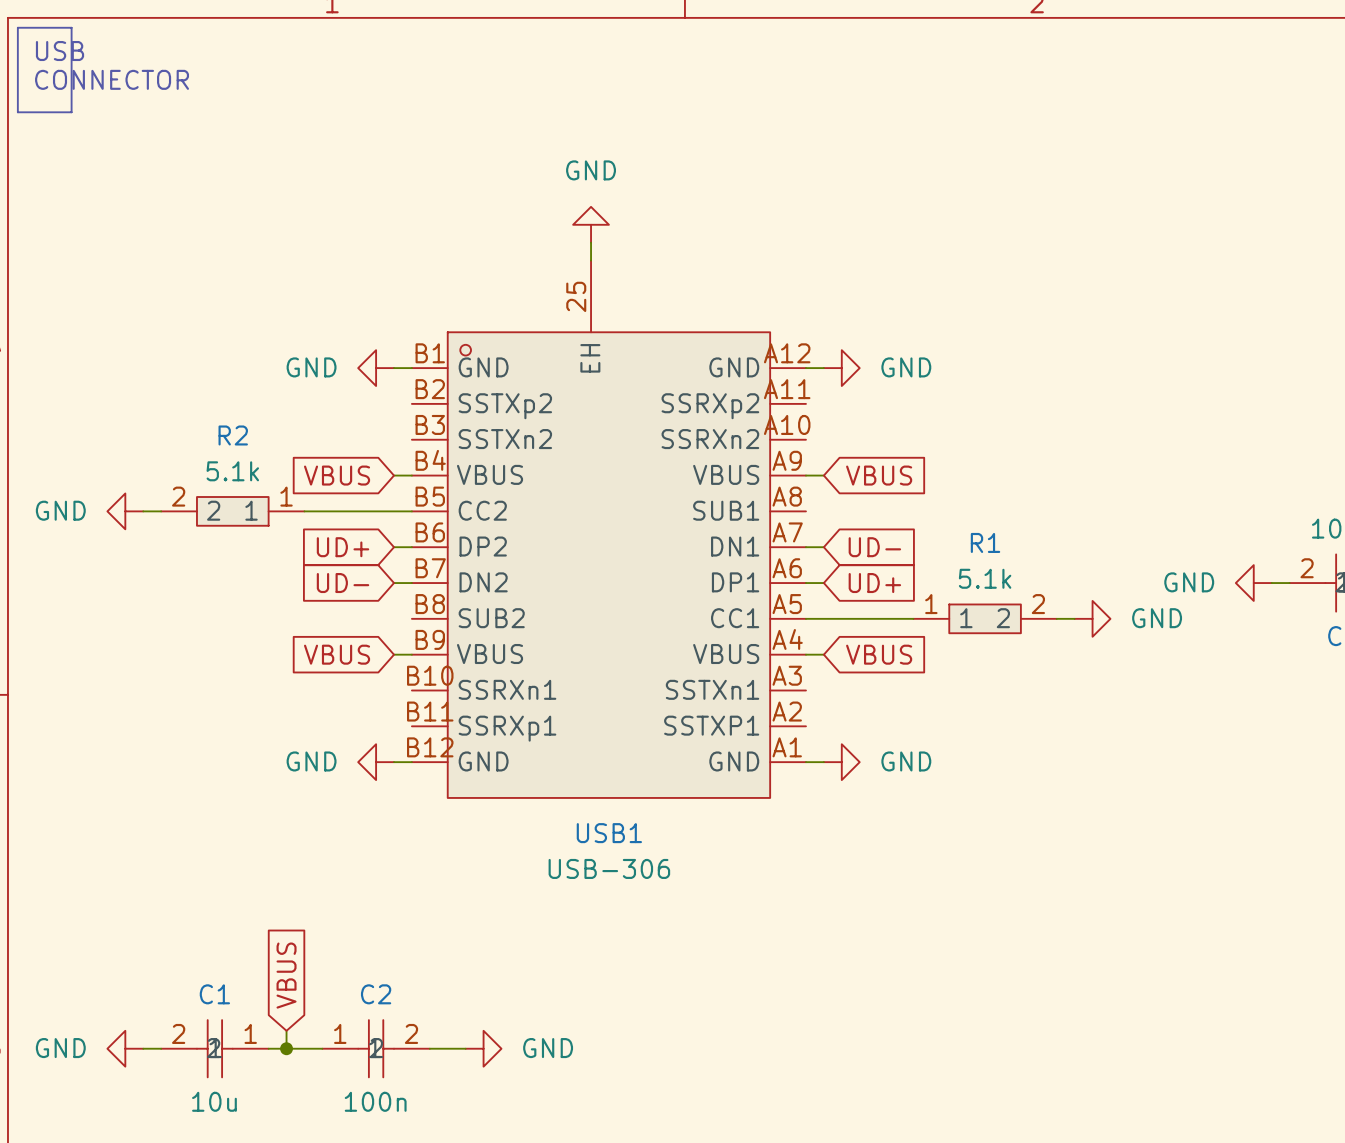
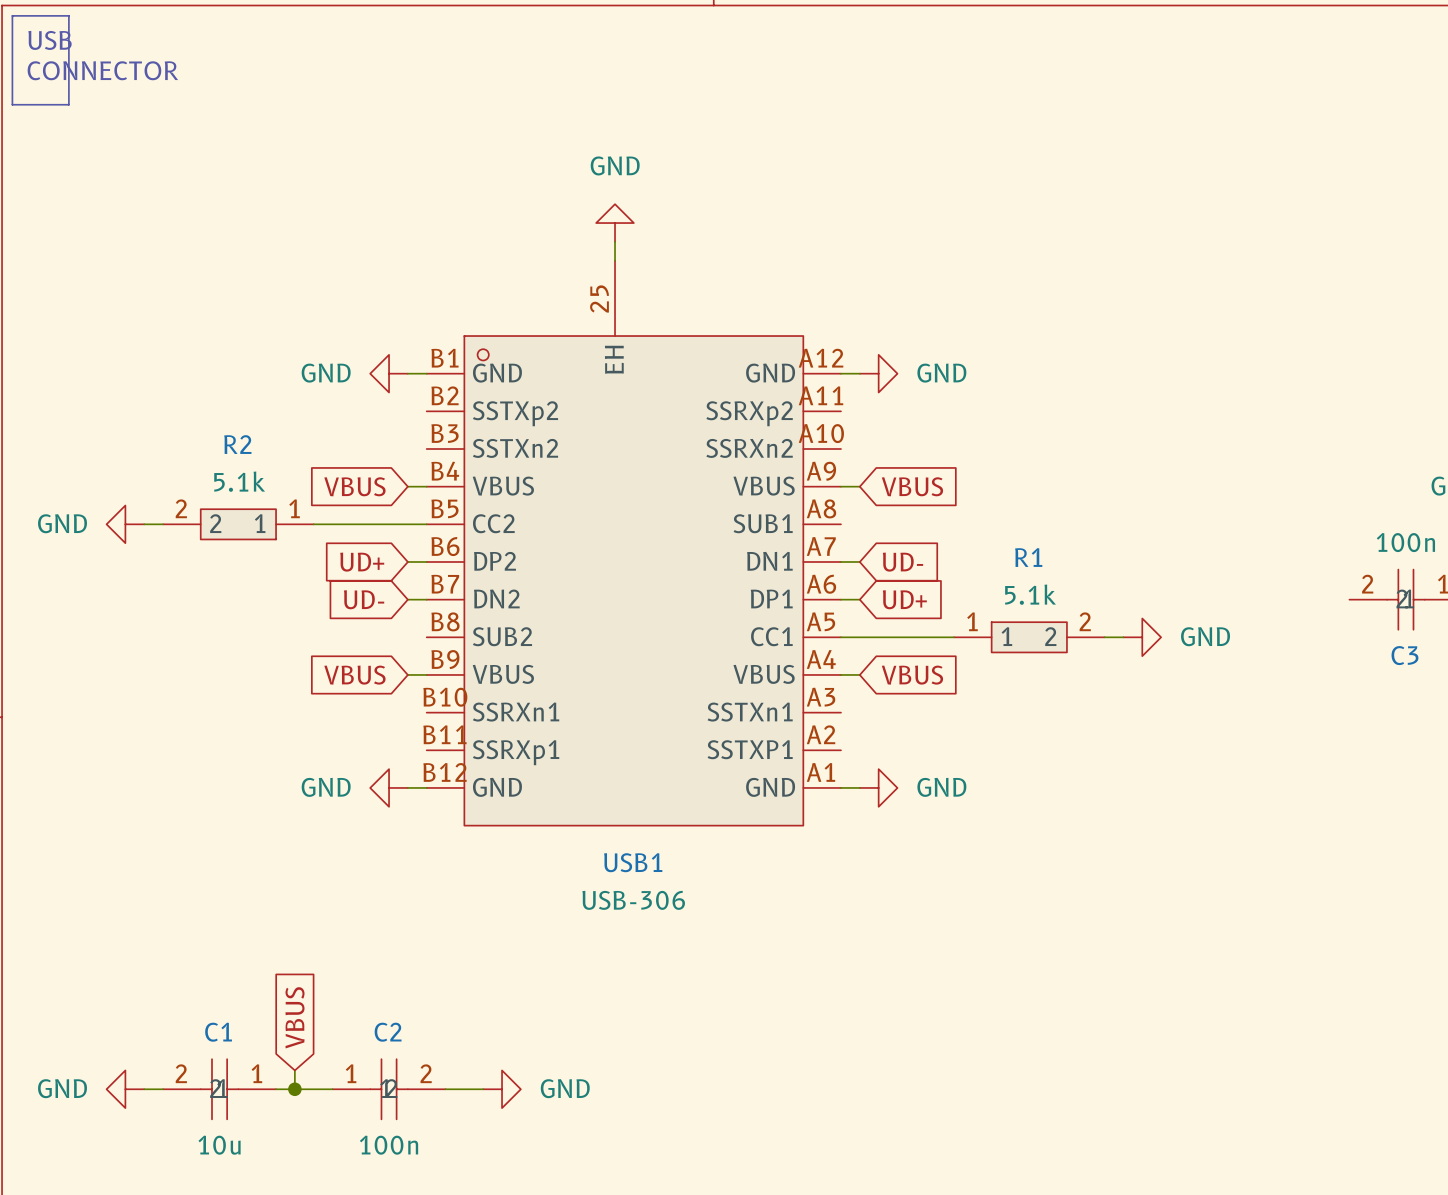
power symbol: GND (1253, 583) -> none
wire: (1271, 583) (1289, 583) -> none

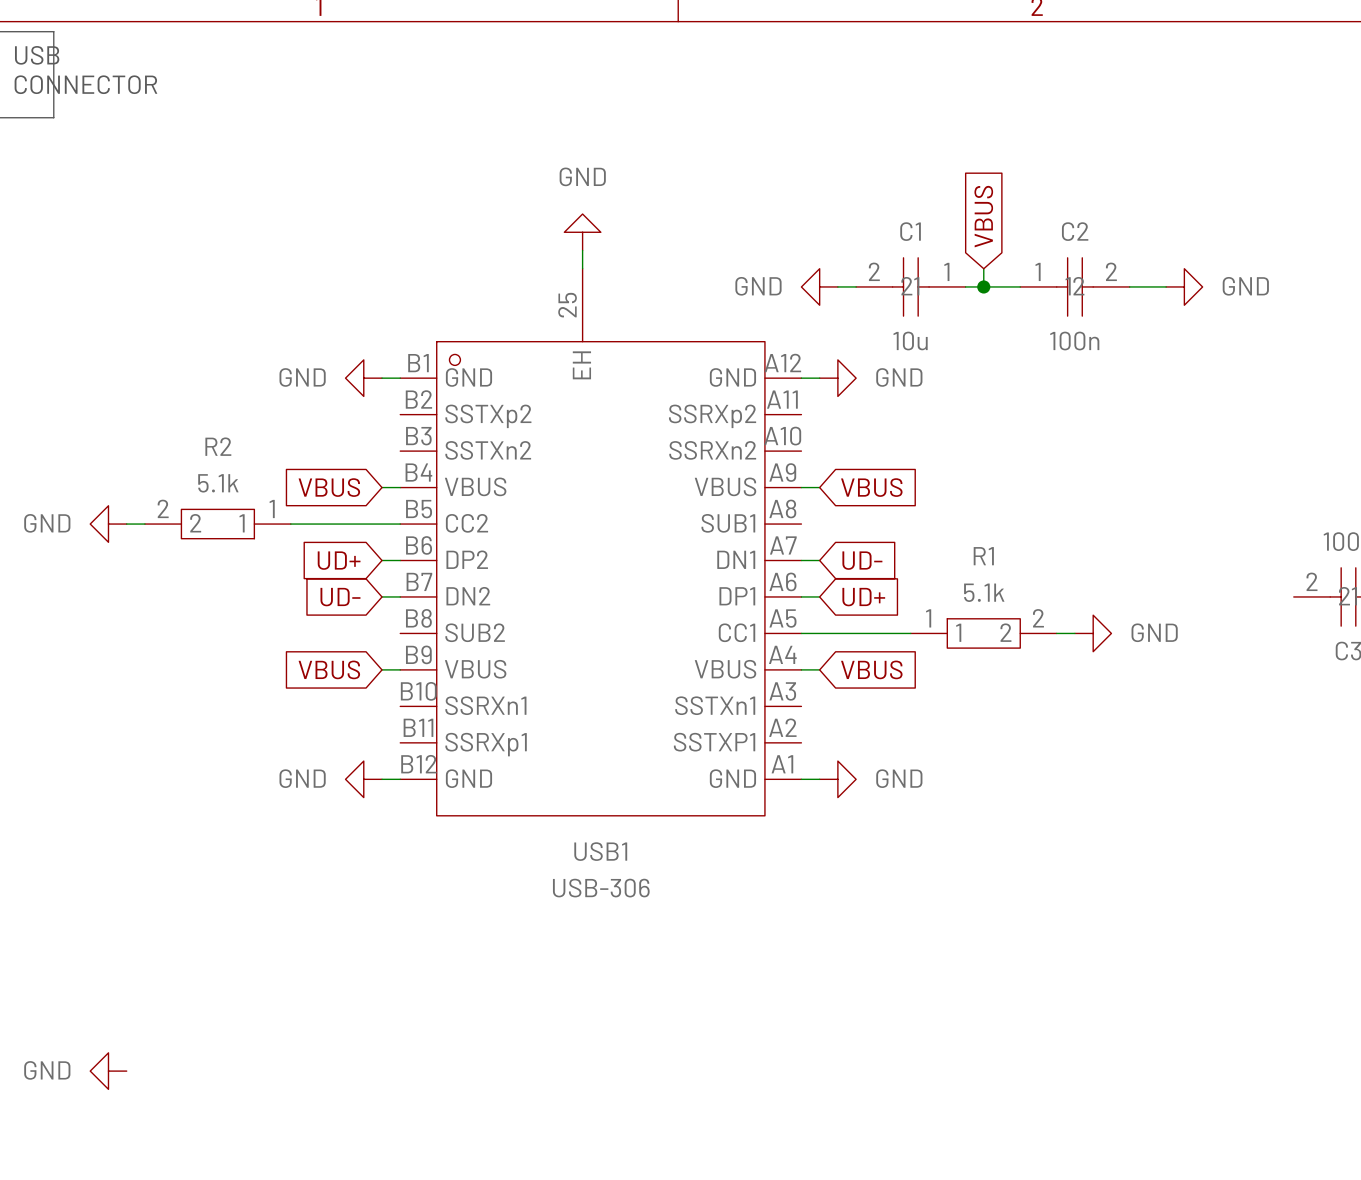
global label: none -> VBUS (983, 216)
wire: none -> (983, 268) (983, 286)
power symbol: none -> GND (819, 286)
wire: none -> (837, 286) (856, 286)
wire: none -> (965, 286) (1020, 286)
junction: none -> (983, 286)
wire: none -> (1129, 286) (1166, 286)
power symbol: none -> GND (1184, 286)
global label: VBUS (295, 1017) -> none
wire: (294, 1070) (294, 1089) -> none
wire: (144, 1089) (163, 1089) -> none
C1 position: (219, 1089) -> (910, 286)
wire: (276, 1089) (332, 1089) -> none
junction: (294, 1089) -> none
C2 position: (389, 1089) -> (1074, 286)
wire: (445, 1089) (483, 1089) -> none
power symbol: GND (502, 1089) -> none

